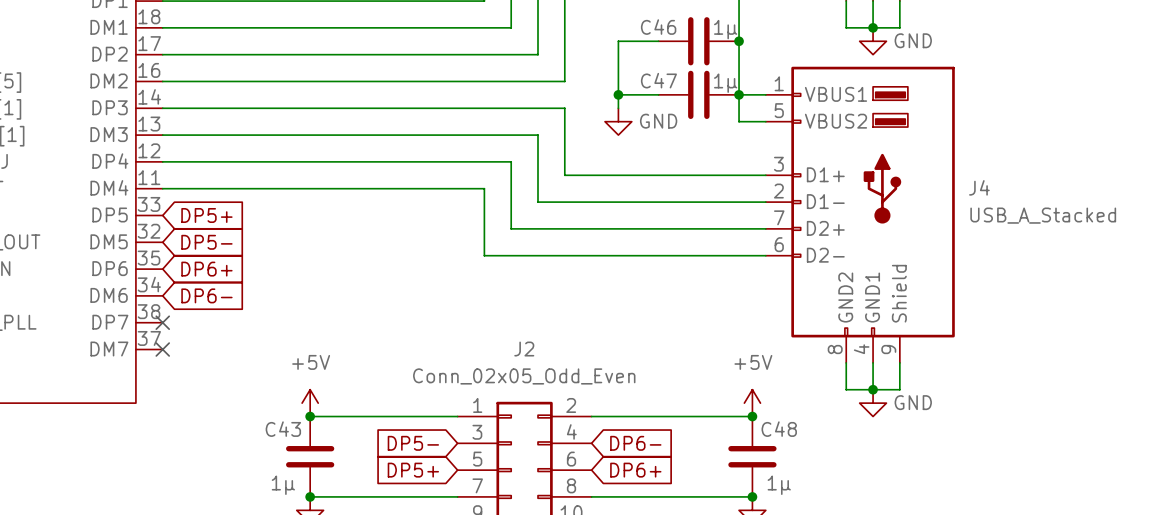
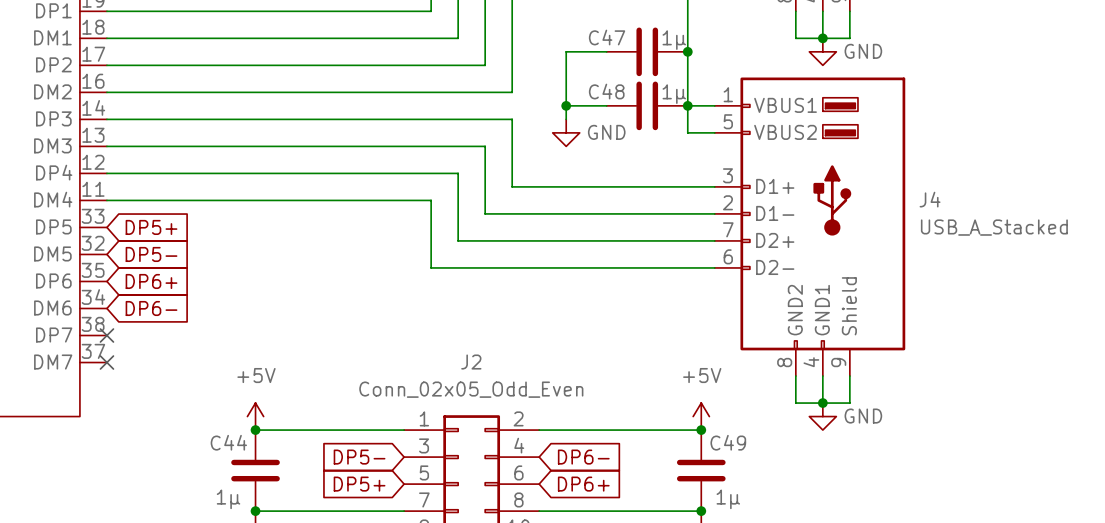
C46 name: C46 (658, 27) -> C47 (607, 37)
C47 name: C47 (658, 80) -> C48 (606, 91)
C43 name: C43 (283, 429) -> C44 (228, 442)
C48 name: C48 (779, 429) -> C49 (728, 442)

